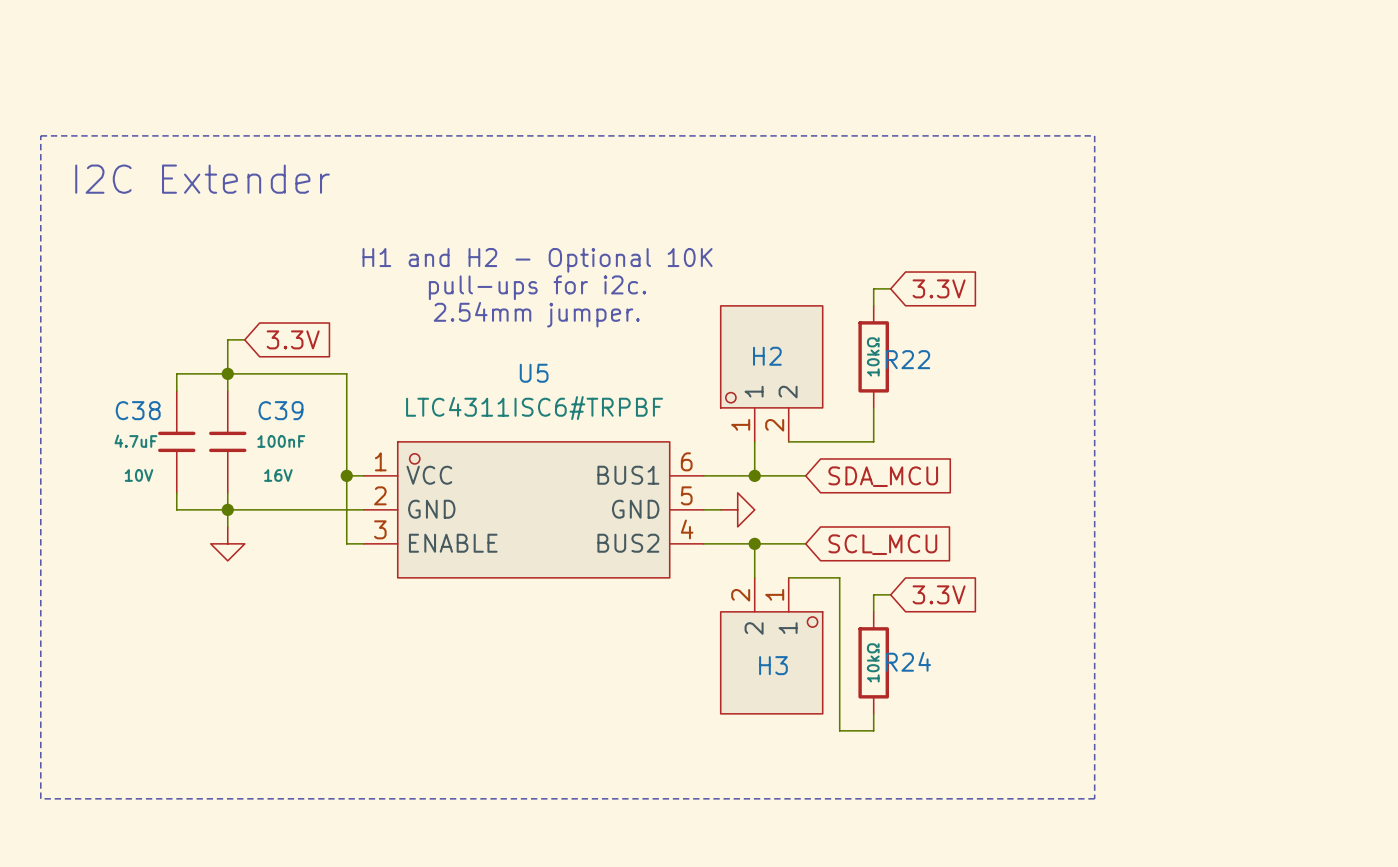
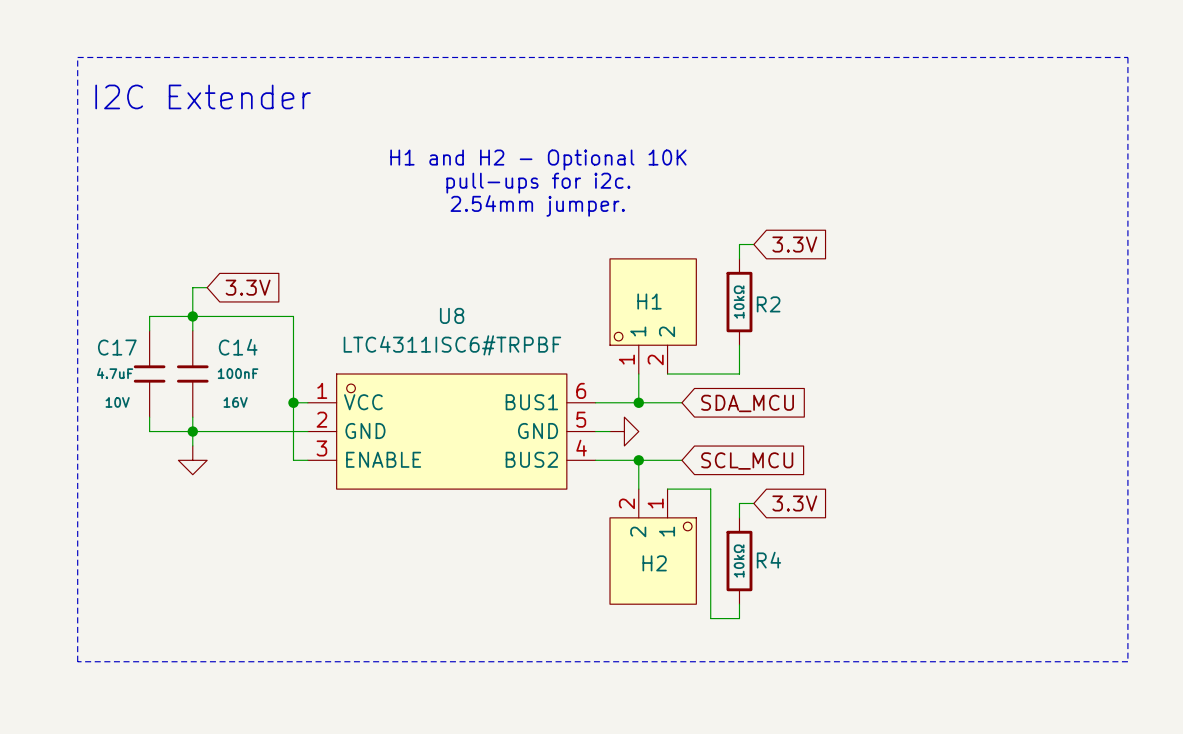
line: (40, 135) (1094, 135) (1094, 798) (40, 798) (40, 135) -> (77, 57) (77, 661) (1127, 661) (1127, 57) (77, 57)
text position: I2C Extender (202, 179) -> I2C Extender (203, 96)
text position: H1 and H2 - Optional 10K (537, 260) -> H1 and H2 - Optional 10K (538, 159)
text position: pull-ups for i2c. (537, 287) -> pull-ups for i2c. (538, 183)
text position: 2.54mm jumper. (536, 314) -> 2.54mm jumper. (537, 205)
H2 name: H2 (767, 356) -> H1 (649, 301)
R22 name: R22 (908, 359) -> R2 (768, 304)
U5 name: U5 (534, 373) -> U8 (452, 315)
C38 name: C38 (138, 410) -> C17 (117, 347)
C39 name: C39 (280, 410) -> C14 (238, 347)
R24 name: R24 (908, 661) -> R4 (768, 560)
H3 name: H3 (773, 665) -> H2 (654, 563)

